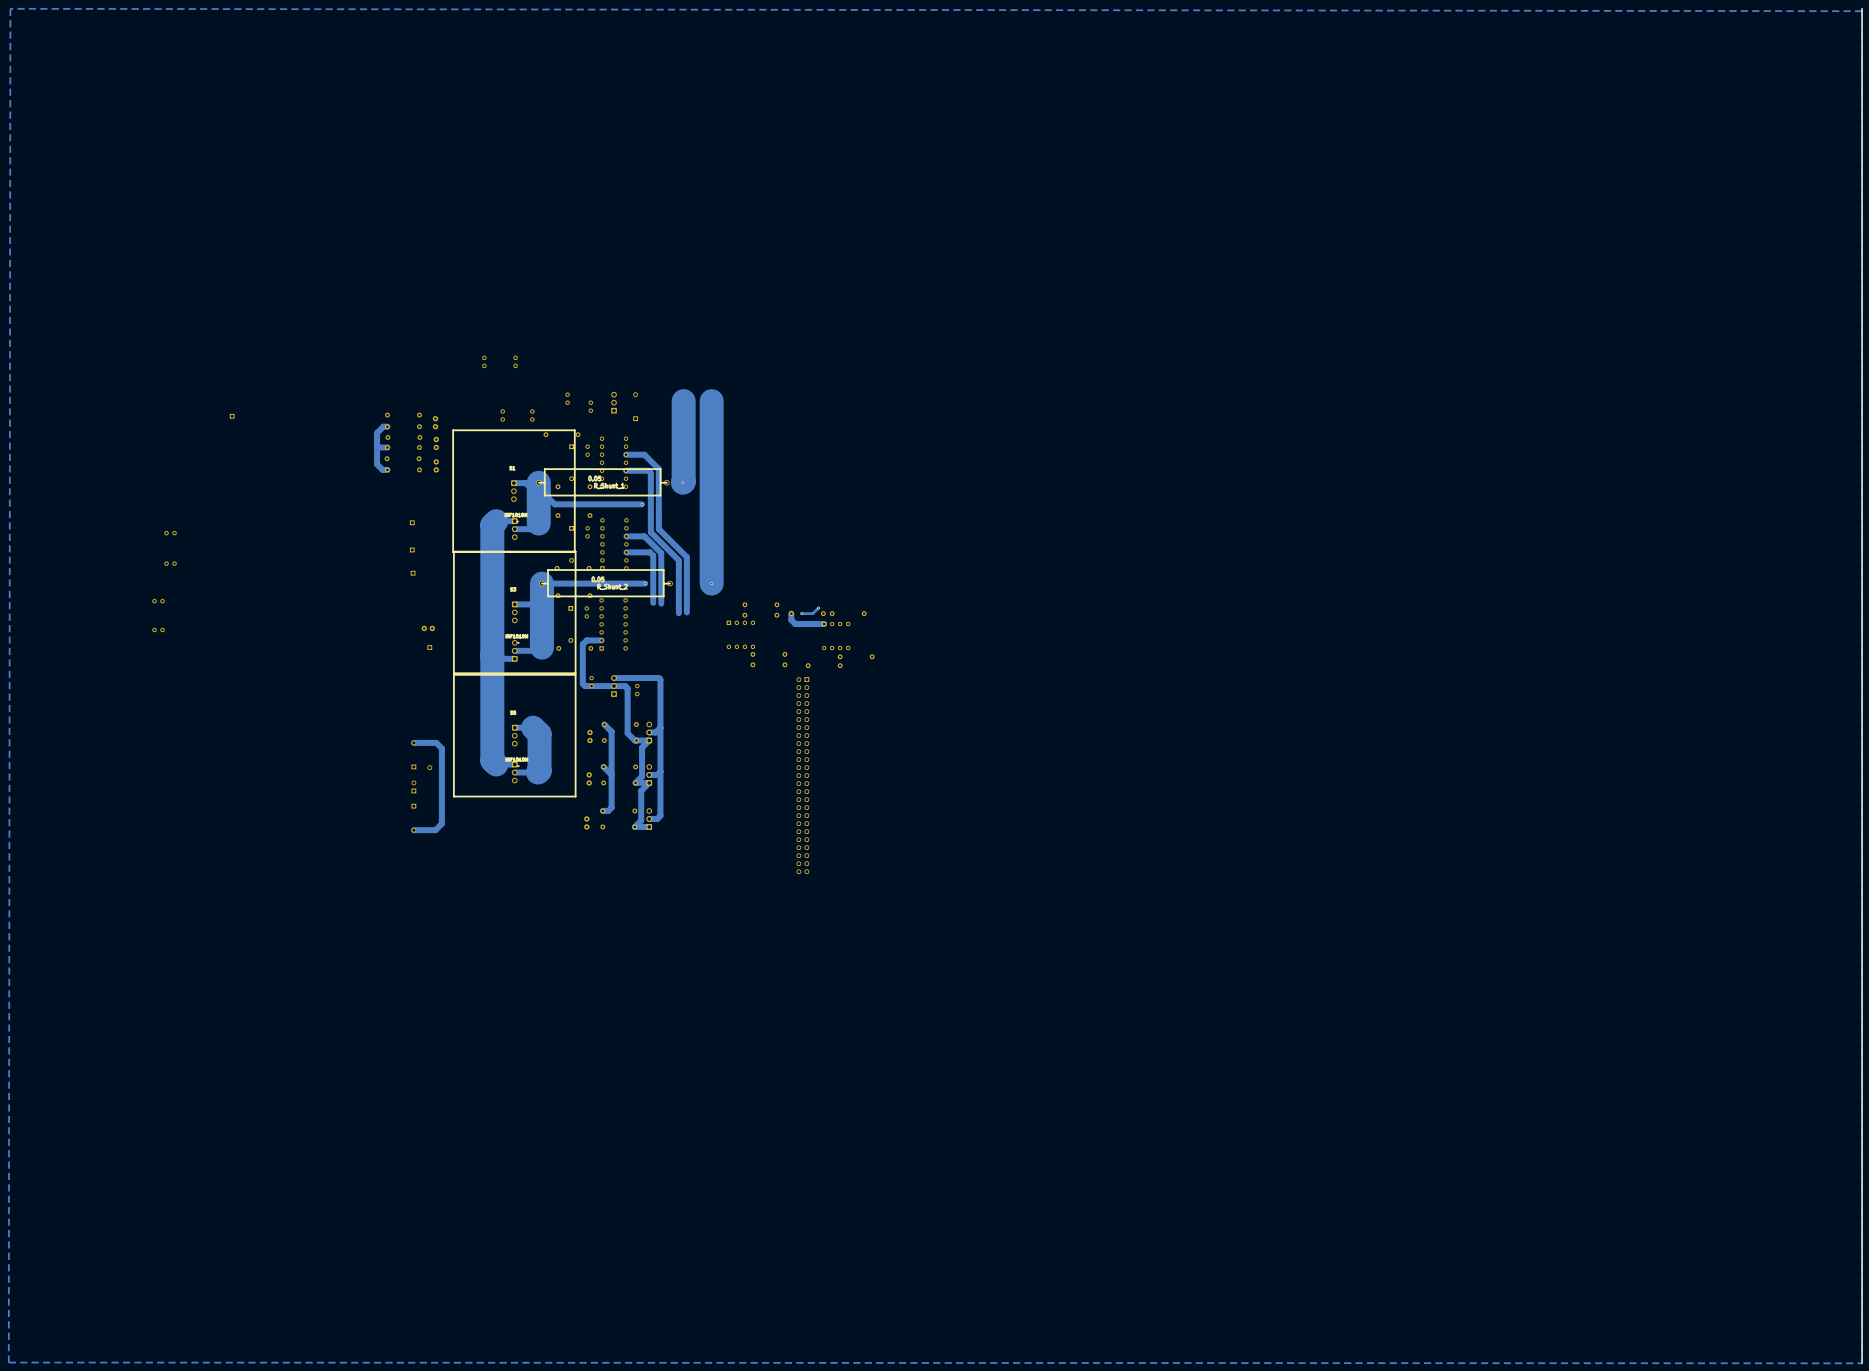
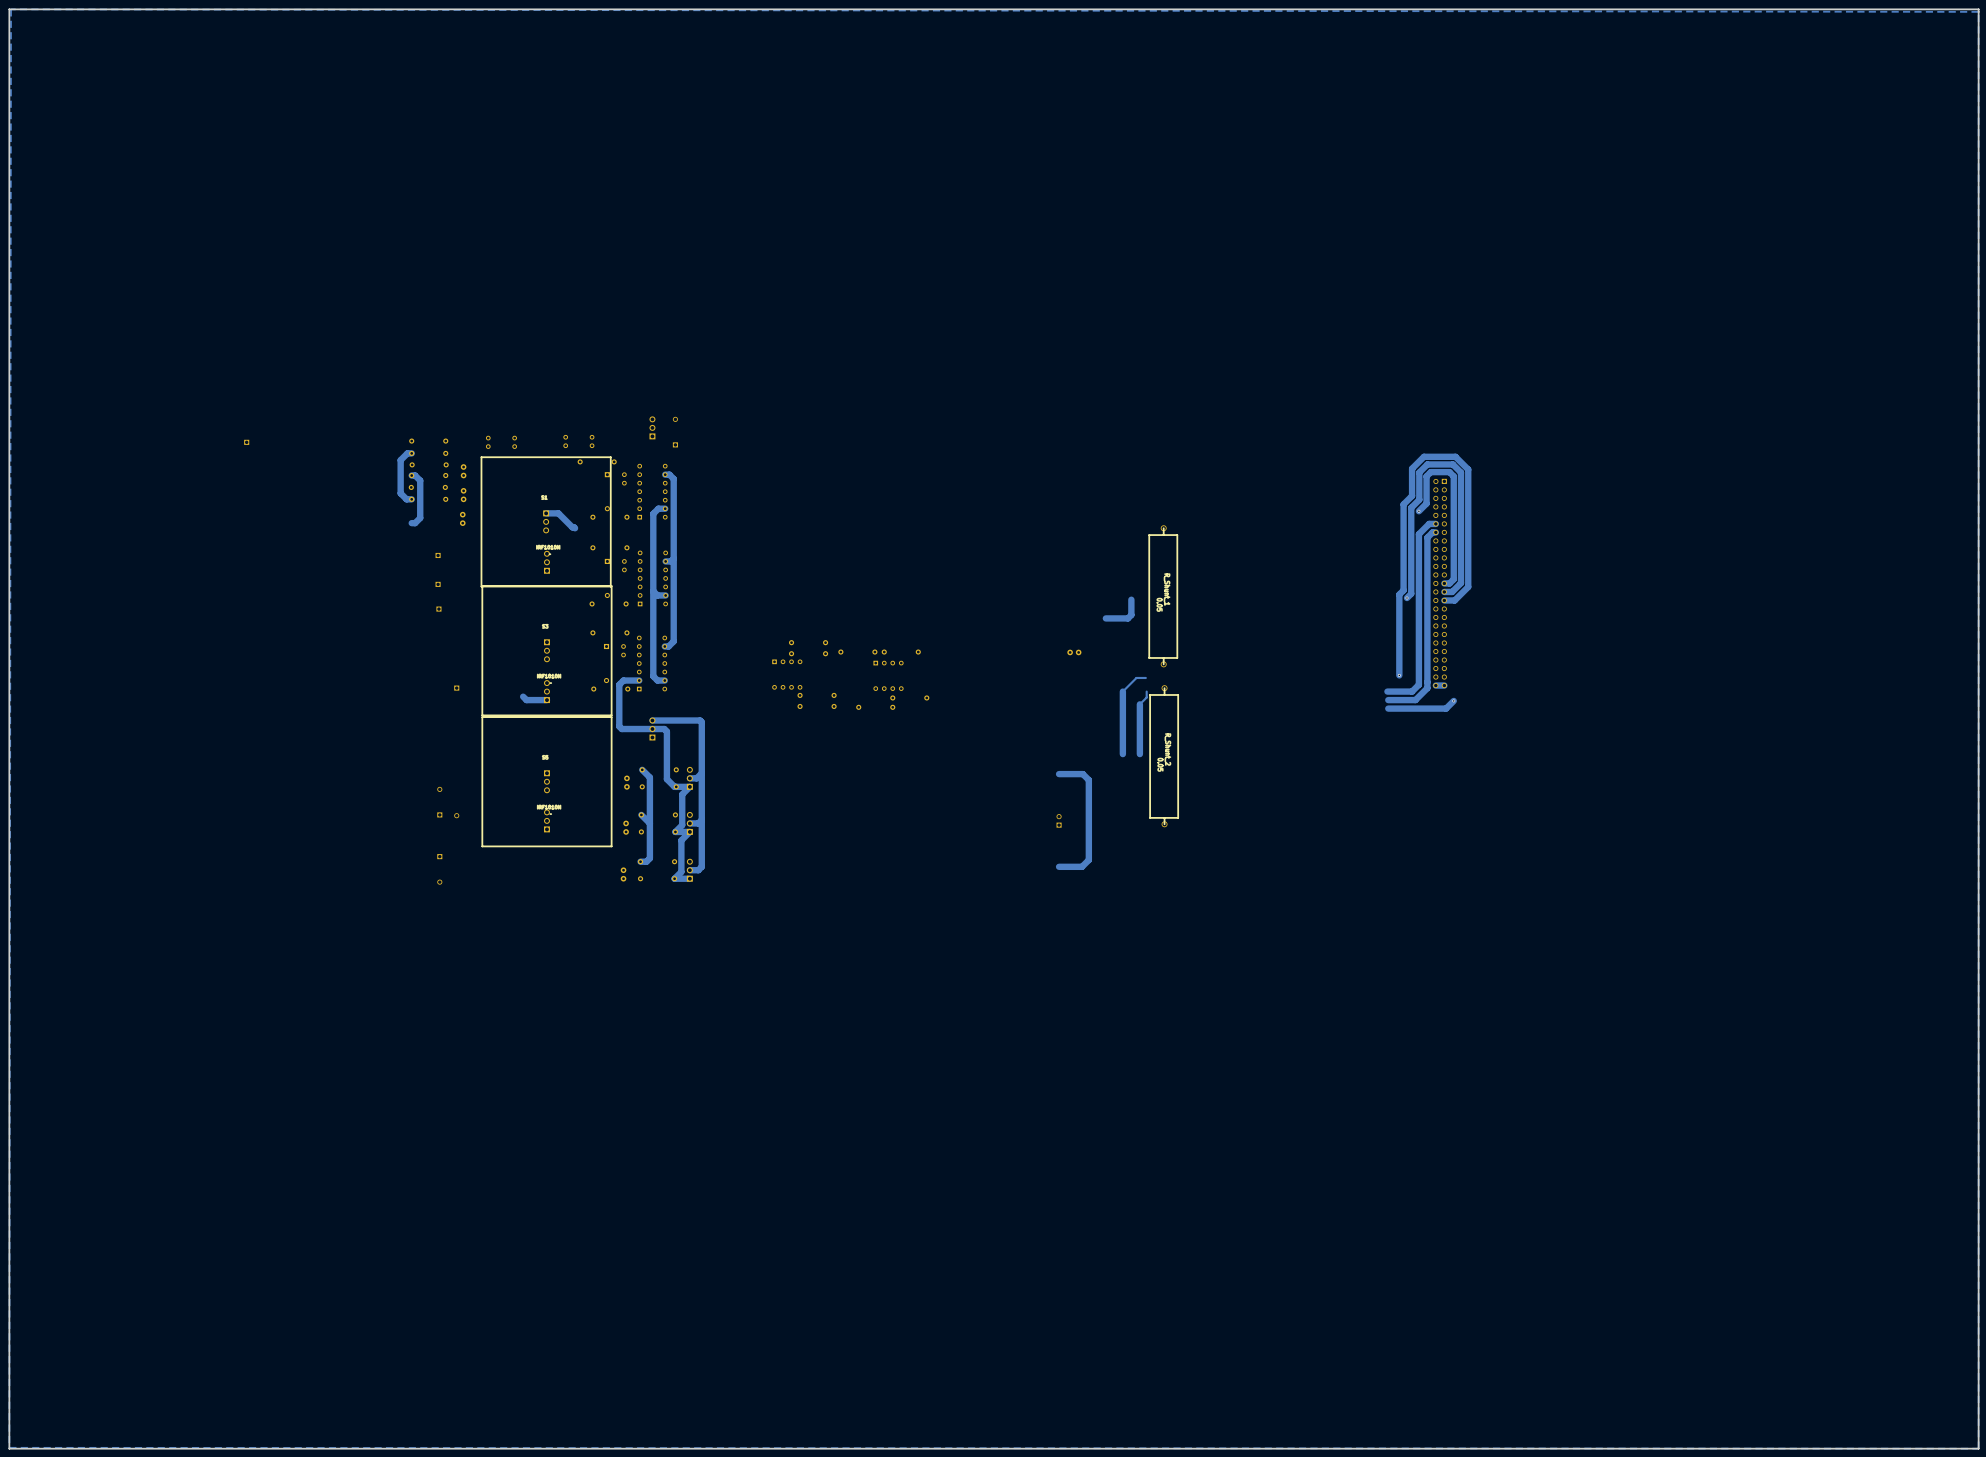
board edge: none -> (1978, 9) (9, 9) (9, 1448) (1978, 1448)
part: (484, 361) -> none
part: (515, 361) -> none
part: (567, 398) -> none
track: (683, 401) (682, 482) -> none
track: (711, 401) (711, 583) -> none
part: (590, 406) -> none
part position: (502, 415) -> (514, 442)
part: none -> (592, 441)
part: none -> (488, 442)
part position: (435, 422) -> (462, 518)
track: (377, 445) (387, 447) -> (411, 523) (415, 523) (420, 518) (420, 480) (415, 475) (411, 475)
track: none -> (665, 474) (669, 474) (673, 478) (673, 641) (668, 646) (664, 646)
track: (626, 454) (644, 454) (658, 469) (658, 529) (686, 557) (686, 612) -> none
track: (626, 470) (648, 470) (650, 473) (650, 532) (678, 560) (678, 613) -> none
track: none -> (665, 508) (658, 508) (653, 513) (653, 676) (657, 680) (664, 680)
track: none -> (1418, 511) (1426, 503) (1426, 476) (1430, 472) (1449, 472) (1453, 476) (1453, 579) (1449, 583) (1444, 583)
via: none -> (1418, 511)
track: (538, 482) (538, 523) (533, 529) (514, 529) -> none
part rotation: 0° (602, 482) -> 90° counterclockwise (1163, 596)
part position: (602, 482) -> (1163, 596)
via: (682, 482) -> none
track: none -> (1435, 523) (1429, 523) (1418, 534) (1418, 684) (1412, 691) (1387, 691)
track: (538, 497) (547, 497) (554, 504) (642, 504) -> none
track: none -> (1435, 532) (1432, 532) (1427, 537) (1427, 688) (1415, 700) (1388, 700)
via: (642, 504) -> none
track: (514, 521) (496, 521) (492, 525) (492, 760) (496, 764) (514, 764) -> none
track: none -> (673, 558) (671, 561) (665, 561)
part rotation: 0° (514, 529) -> 180° (546, 562)
part: (170, 533) -> none
track: (626, 536) (644, 536) (661, 553) (661, 603) -> none
part: none -> (1440, 583)
track: (626, 552) (650, 552) (653, 555) (653, 602) -> none
track: none -> (653, 591) (657, 595) (665, 595)
track: none -> (1444, 591) (1452, 591) (1461, 583) (1461, 472) (1452, 464) (1427, 464) (1419, 472) (1419, 499) (1411, 507) (1411, 593) (1406, 598)
via: none -> (1406, 598)
part: (170, 563) -> none
track: none -> (1131, 599) (1131, 615) (1127, 618) (1105, 618)
track: none -> (1444, 600) (1454, 600) (1468, 586) (1468, 469) (1455, 456) (1424, 456) (1412, 468) (1412, 495) (1403, 504) (1403, 590) (1399, 594) (1399, 675)
part rotation: 0° (606, 583) -> 90° counterclockwise (1164, 756)
part position: (606, 583) -> (1164, 756)
track: (645, 583) (541, 583) (541, 647) (538, 650) (514, 650) -> none
via: (645, 583) -> none
via: (711, 583) -> none
part: (158, 601) -> none
track: (514, 604) (541, 605) -> none
track: (818, 608) (812, 613) (801, 613) -> none
via: (818, 608) -> none
track: (791, 613) (791, 620) (795, 624) (824, 624) -> none
via: (801, 613) -> none
part: none -> (1074, 652)
part: (428, 628) -> none
part: (158, 630) -> none
via: none -> (1399, 675)
track: none -> (1145, 677) (1136, 677) (1122, 691) (1122, 754)
track: none -> (1444, 685) (1435, 685)
track: none -> (1146, 691) (1146, 697) (1139, 704) (1139, 754)
track: none -> (1453, 700) (1446, 708) (1388, 708)
via: none -> (1453, 700)
part: (591, 682) -> none
part: (637, 690) -> none
track: (514, 727) (533, 727) (539, 734) (539, 770) (514, 772) -> none
track: none -> (1059, 774) (1082, 774) (1088, 780) (1088, 860) (1082, 866) (1059, 866)
track: (413, 742) (436, 742) (441, 748) (441, 823) (435, 830) (413, 830) -> none
part rotation: 0° (514, 772) -> 180° (546, 820)
part: none -> (1059, 820)
part: (802, 775) -> none
part: (413, 786) -> none

